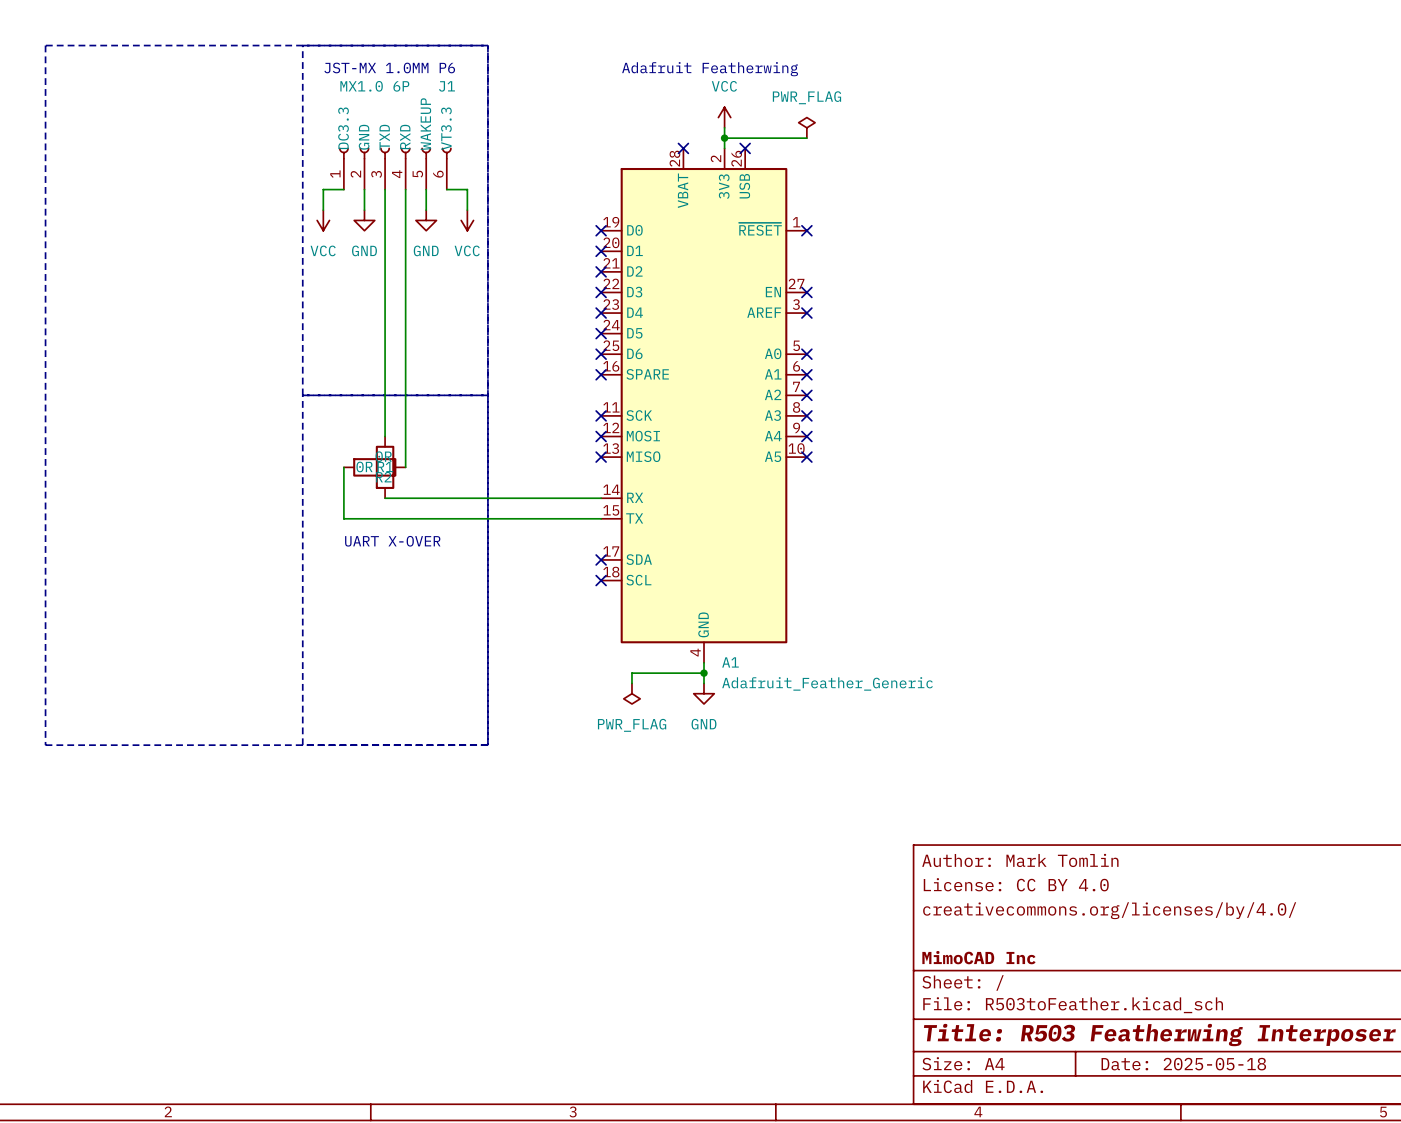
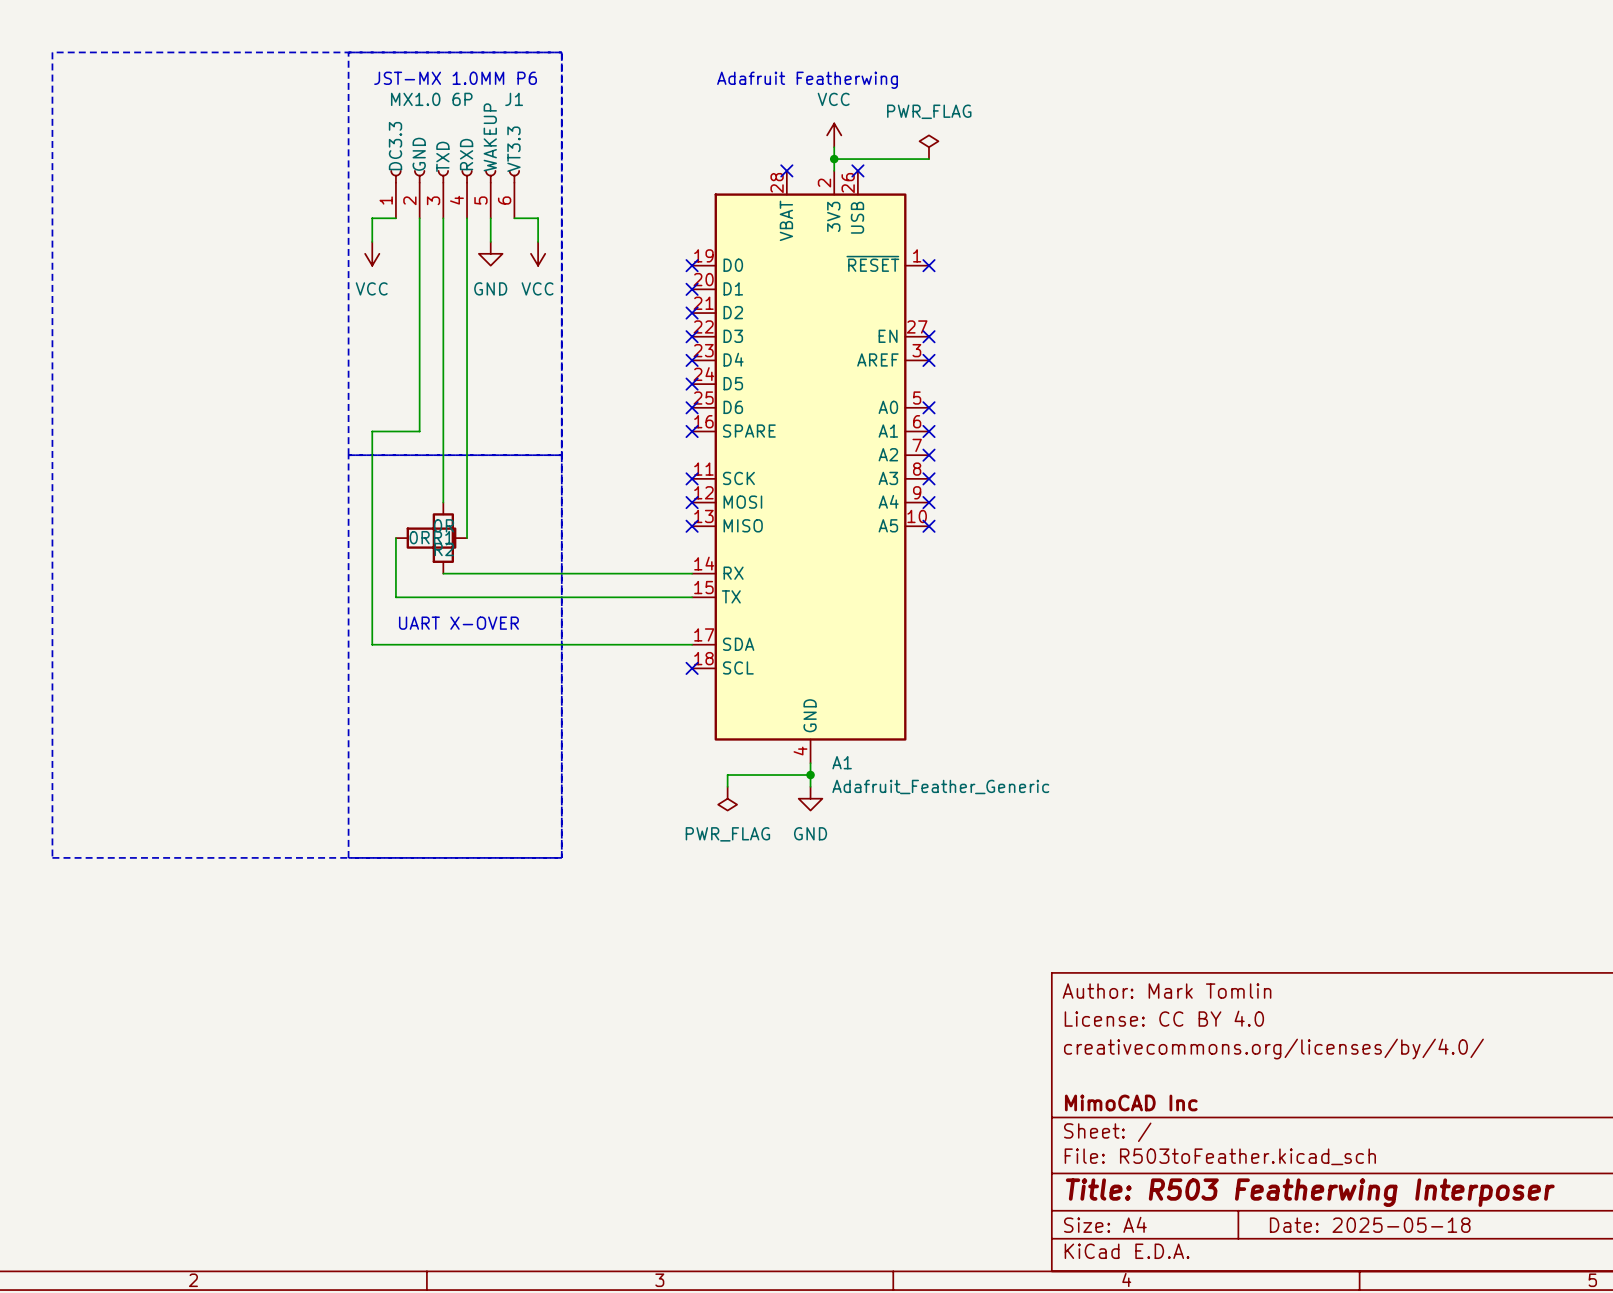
wire: none -> (419, 241) (419, 431) (372, 431) (372, 644) (692, 644)
power symbol: GND (364, 220) -> none
no-connect mark: (601, 559) -> none

